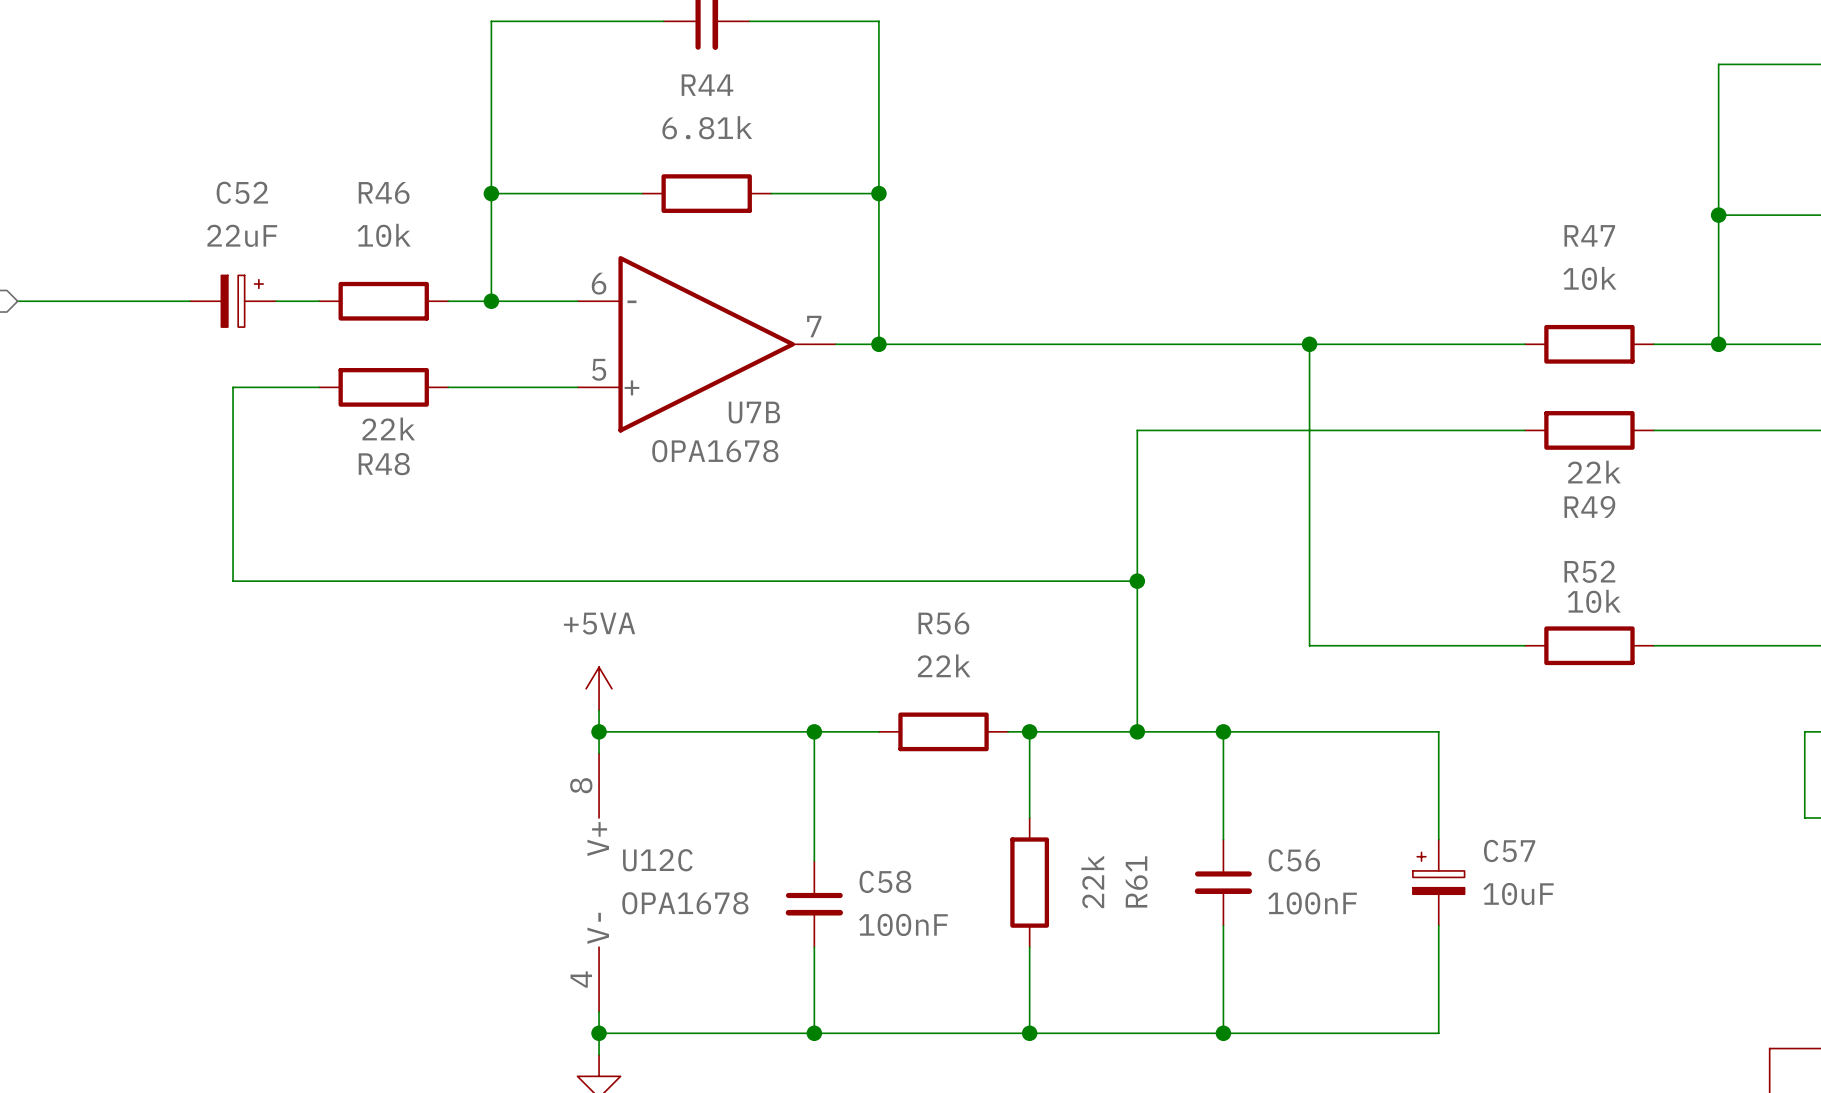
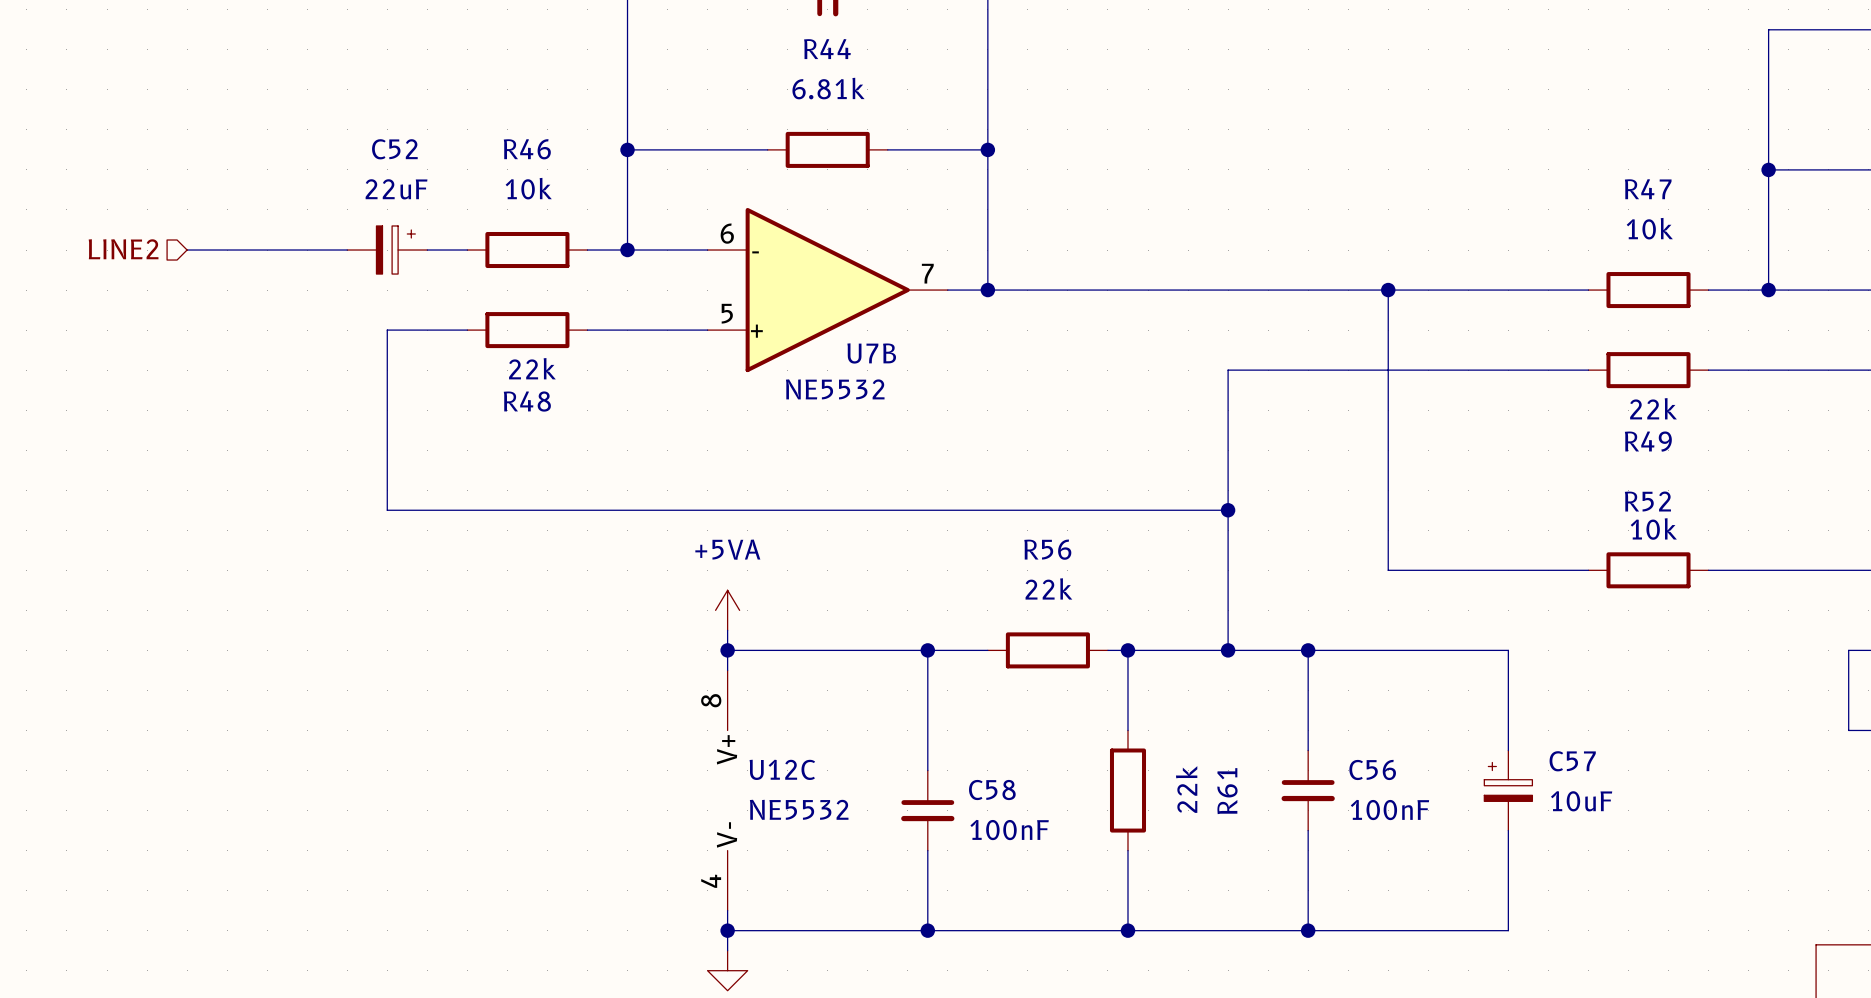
U7B value: OPA1678 (715, 451) -> NE5532 (835, 389)
U12C value: OPA1678 (685, 903) -> NE5532 (799, 809)

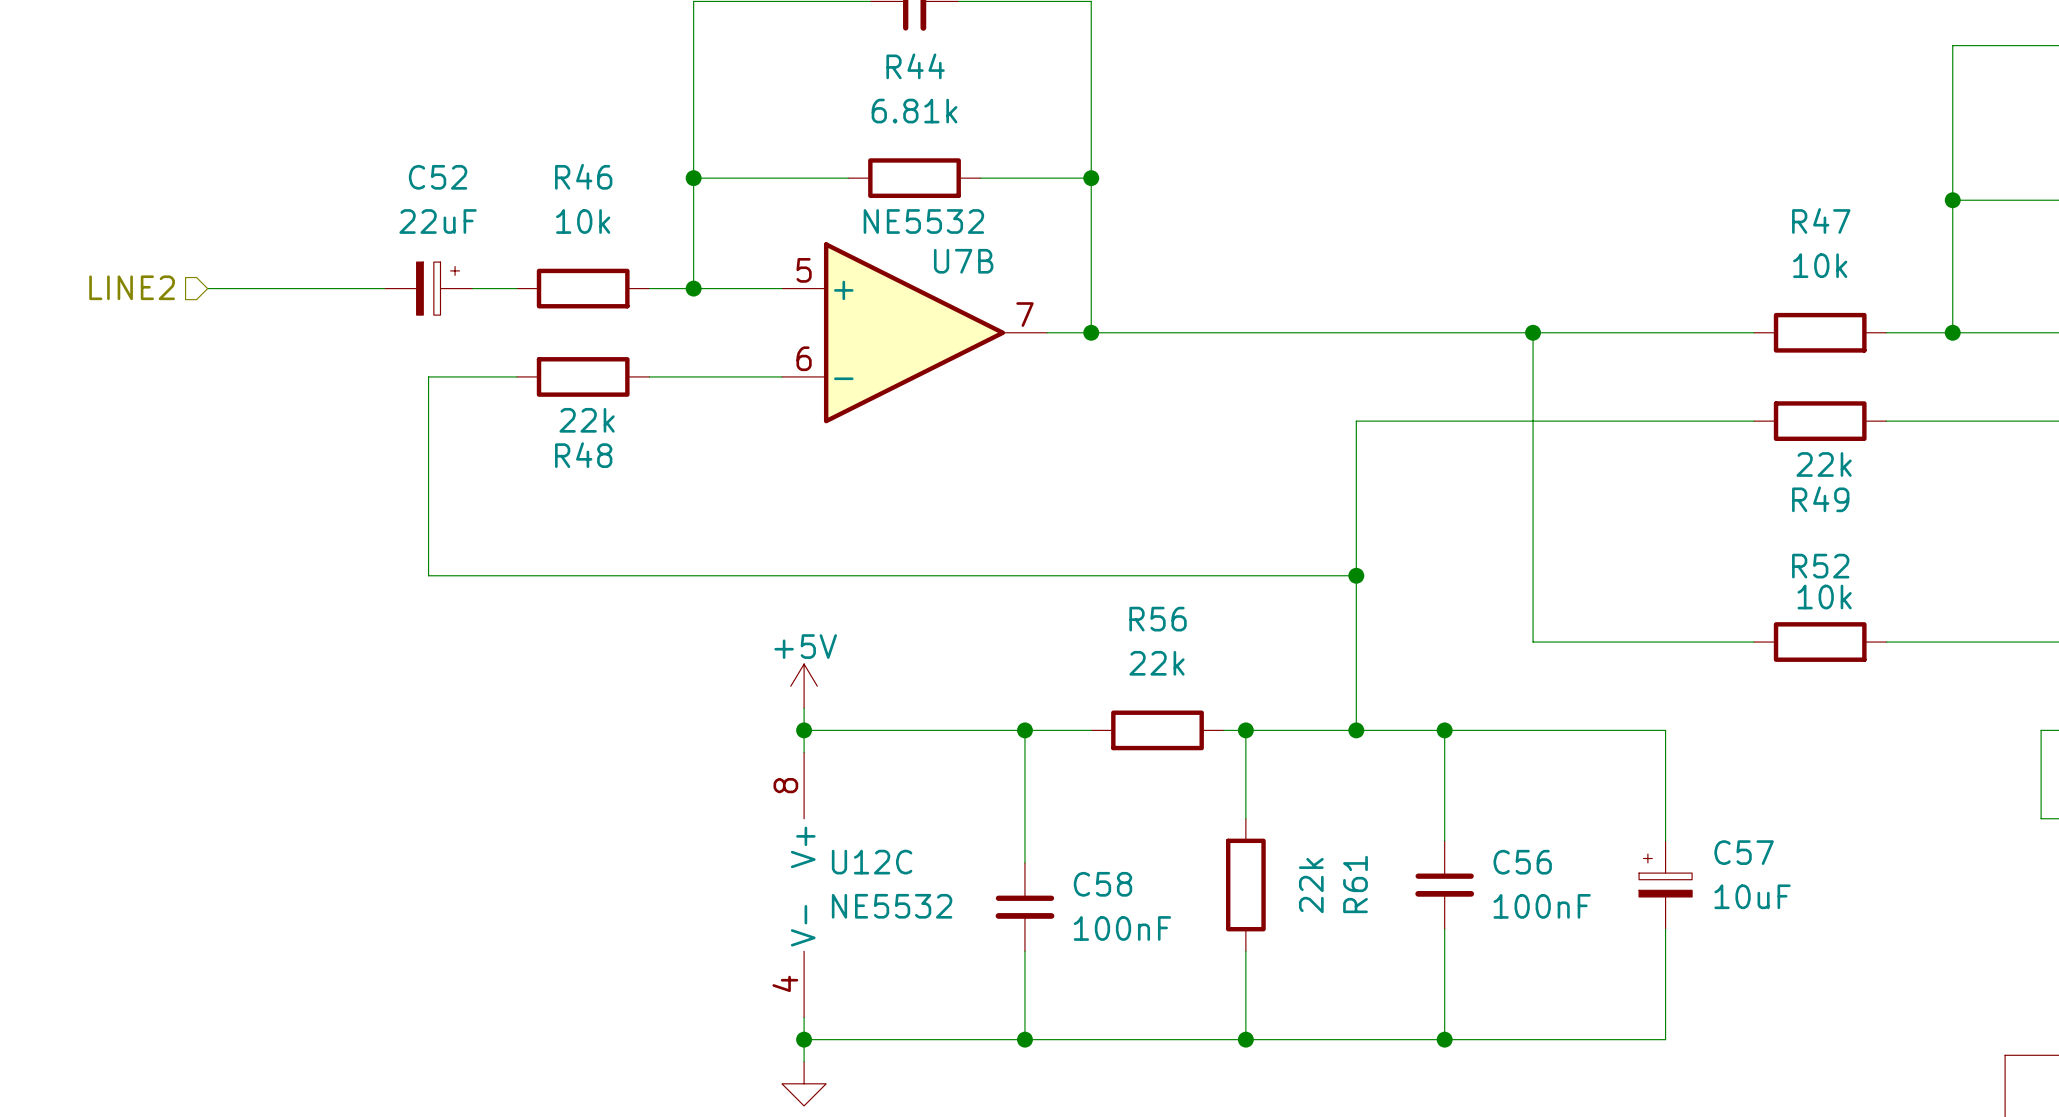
U7B flip: as is (827, 290) -> up-down (914, 332)
power symbol: +5VA (727, 610) -> +5V (804, 686)

